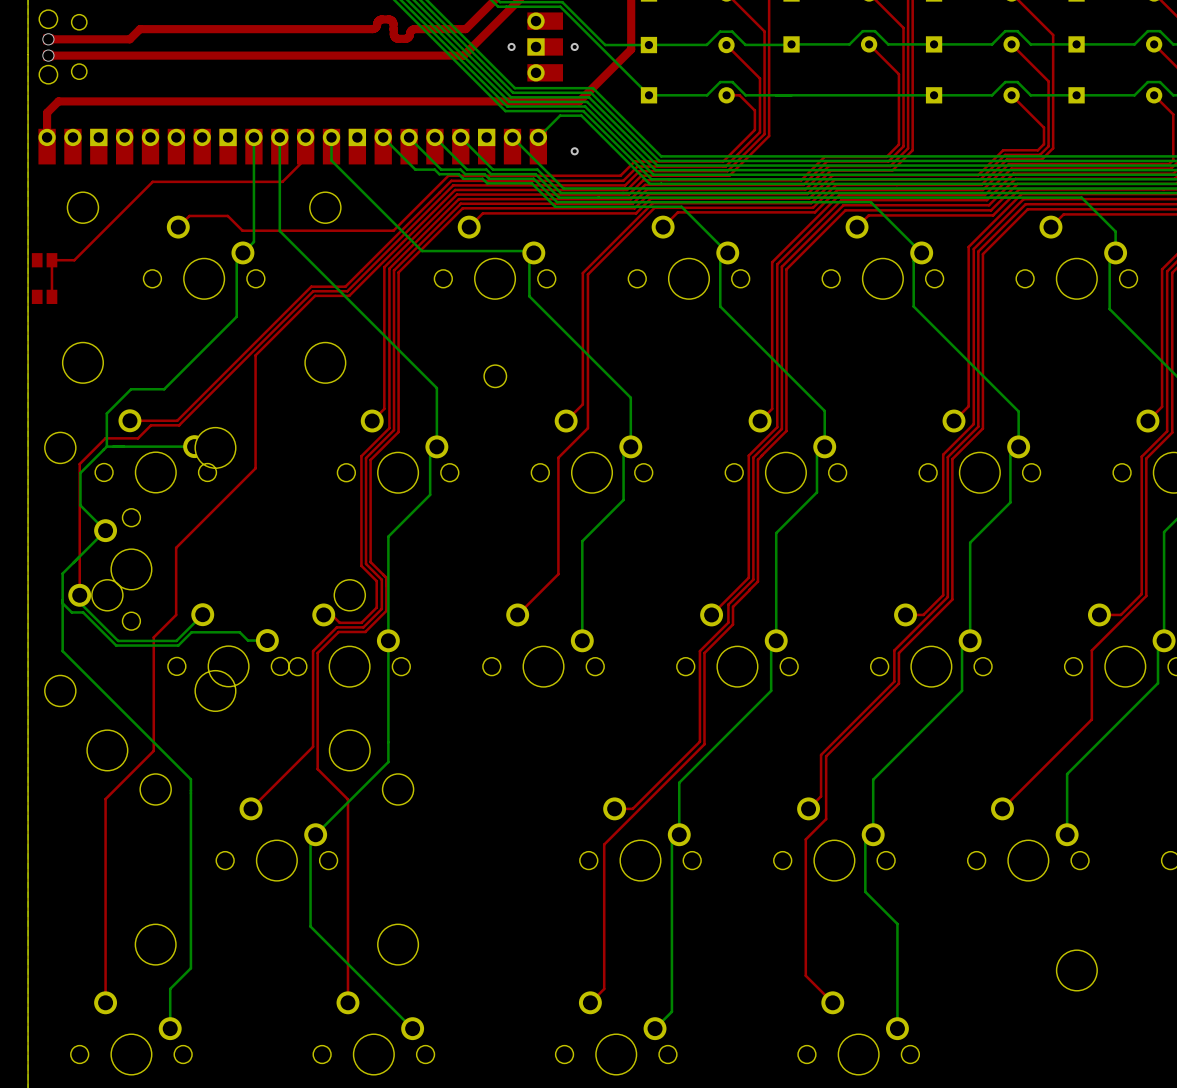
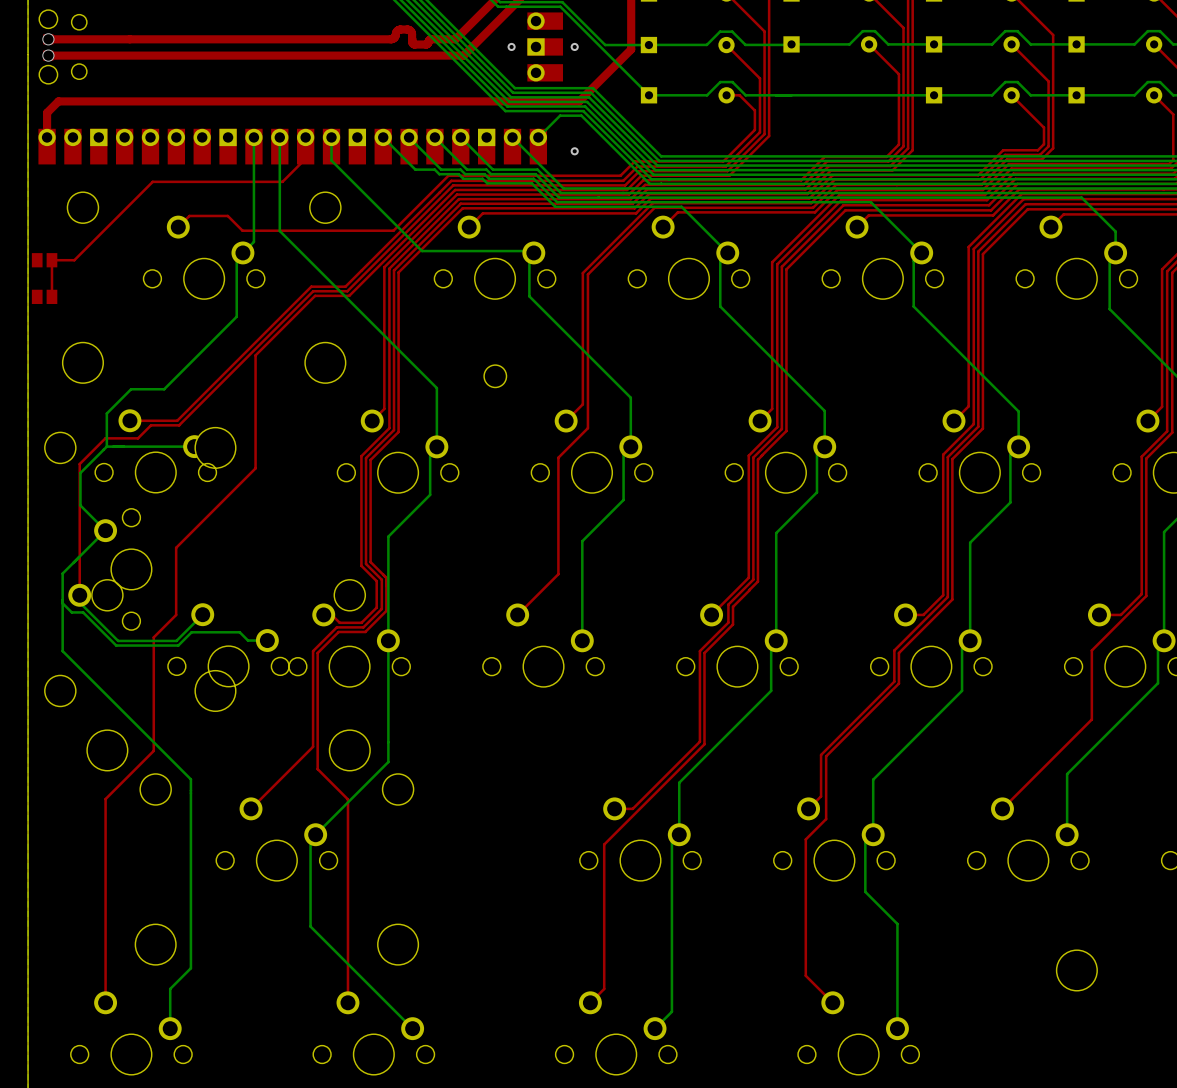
top track: (465, 29) (413, 29) (407, 38) (397, 38) (393, 35) (392, 21) (382, 19) (372, 29) (140, 29) (129, 39) -> (412, 39) (411, 32) (407, 29) (398, 30) (394, 37) (390, 39) (129, 39)
top track: none -> (465, 29) (455, 39) (430, 39) (425, 44) (413, 44) (412, 39)

